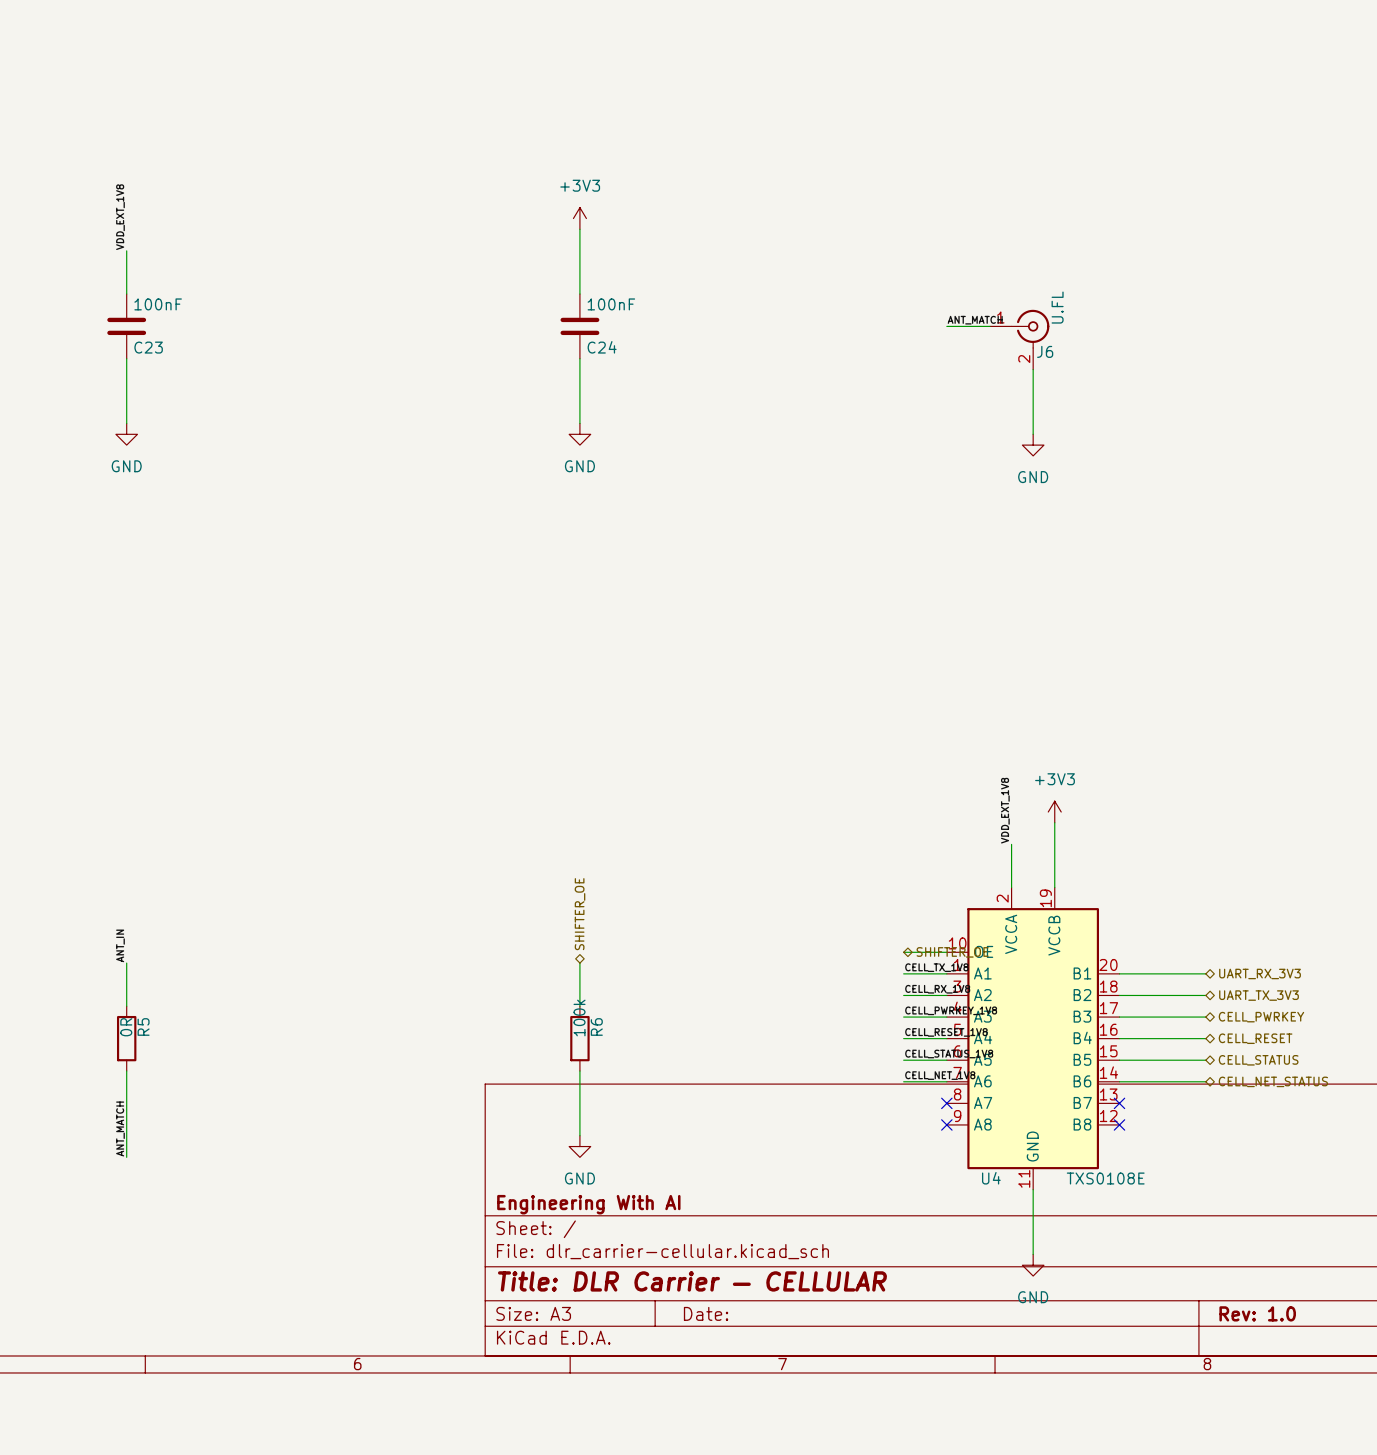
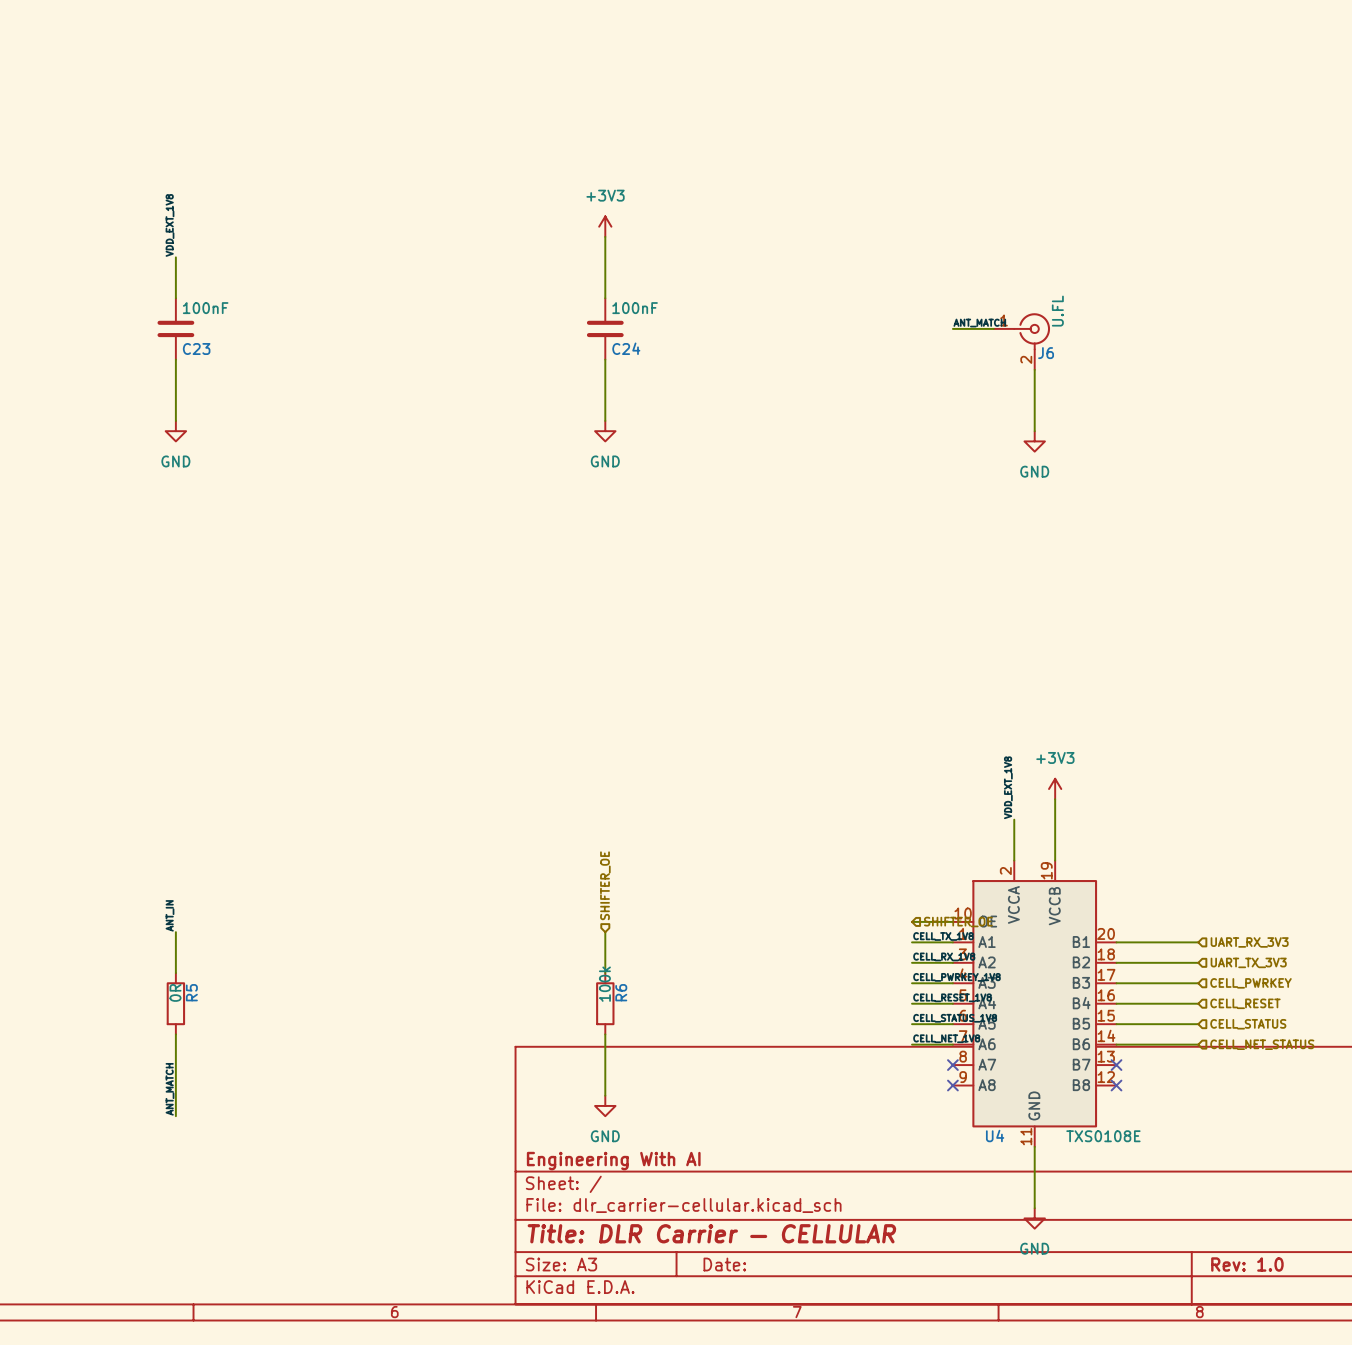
hierarchical label shape: bidirectional (580, 914) -> input (605, 885)
hierarchical label shape: bidirectional (952, 952) -> input (958, 922)
hierarchical label shape: bidirectional (1260, 973) -> input (1249, 942)
hierarchical label shape: bidirectional (1259, 995) -> input (1248, 962)
hierarchical label shape: bidirectional (1261, 1017) -> input (1250, 983)
hierarchical label shape: bidirectional (1255, 1038) -> input (1245, 1003)
hierarchical label shape: bidirectional (1258, 1060) -> input (1248, 1024)
hierarchical label shape: bidirectional (1273, 1081) -> input (1262, 1044)

